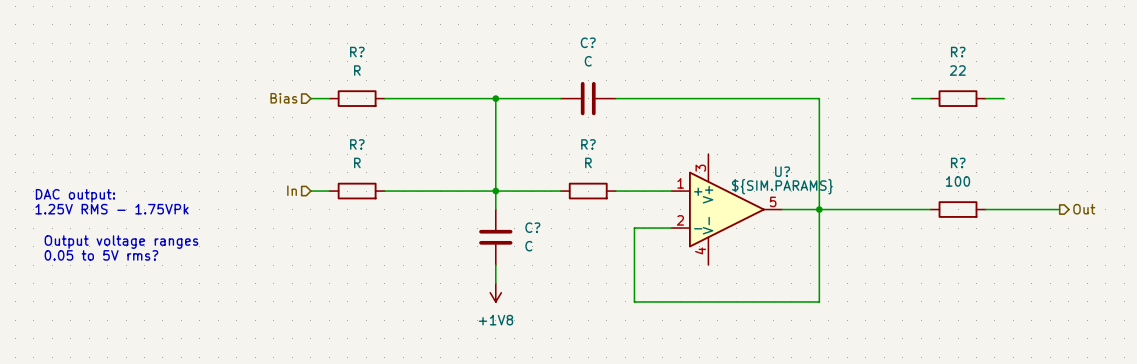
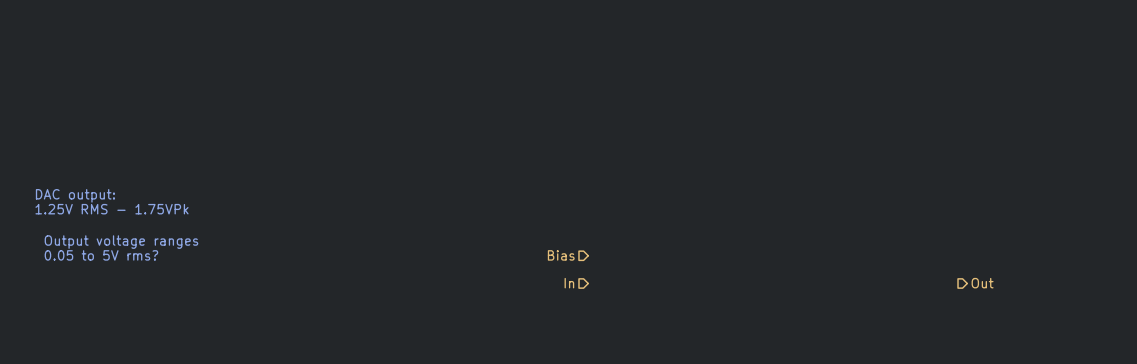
hierarchical label: Bias (283, 98) -> none
wire: (310, 98) (329, 98) -> none
R?: R (357, 98) -> none
wire: (384, 98) (560, 98) -> none
wire: (495, 98) (495, 209) -> none
junction: (495, 98) -> none
C?: C (588, 98) -> none
wire: (615, 98) (819, 98) (819, 301) (634, 301) (634, 228) (671, 228) -> none
wire: (911, 98) (930, 98) -> none
R?: 22 (958, 98) -> none
wire: (985, 98) (1004, 98) -> none
hierarchical label: In (292, 190) -> none
wire: (310, 191) (329, 191) -> none
R?: R (357, 191) -> none
wire: (384, 191) (560, 191) -> none
junction: (495, 191) -> none
R?: R (588, 191) -> none
wire: (615, 191) (671, 191) -> none
U?: ${SIM.PARAMS} (726, 209) -> none
wire: (782, 209) (930, 209) -> none
junction: (819, 209) -> none
R?: 100 (958, 209) -> none
wire: (985, 209) (1059, 209) -> none
hierarchical label position: Out (1084, 209) -> Out (982, 283)
C?: C (495, 237) -> none
hierarchical label: none -> Bias (561, 255)
wire: (495, 265) (495, 283) -> none
hierarchical label: none -> In (569, 283)
power symbol: +1V8 (495, 292) -> none

